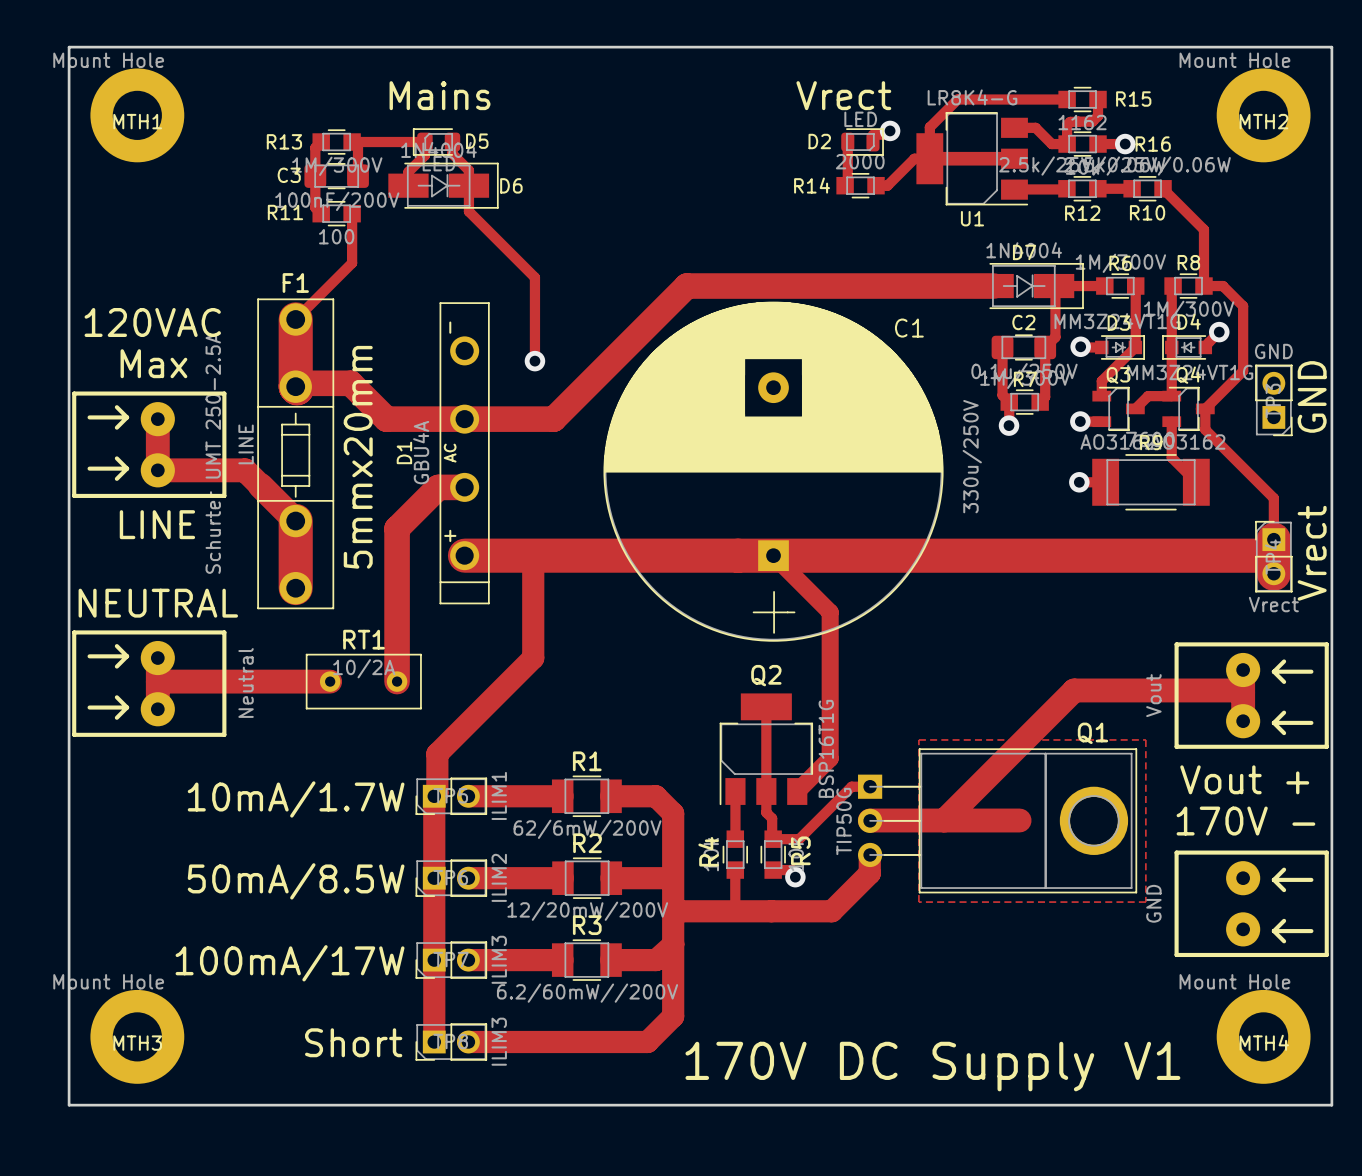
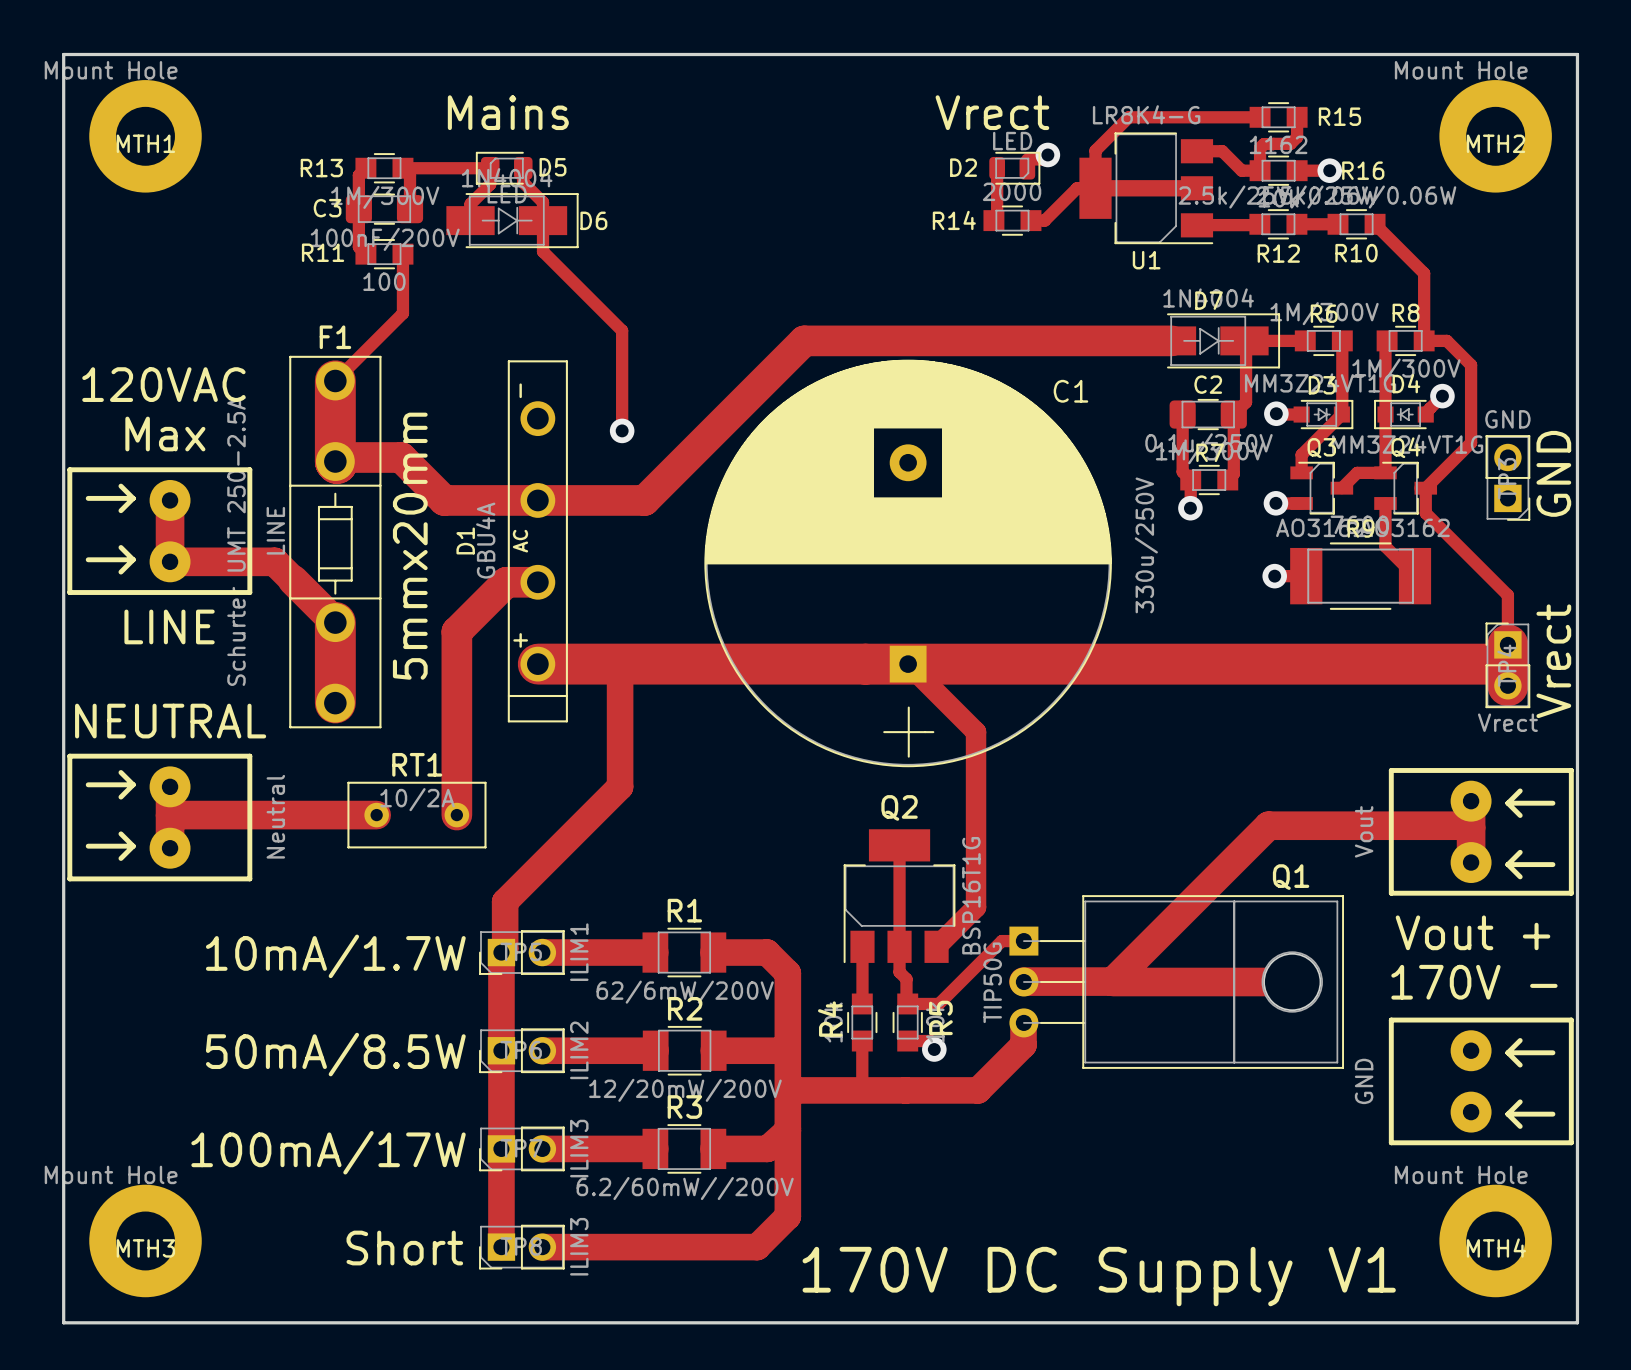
zone outline: (918, 739) (918, 902) (1145, 902) (1145, 739) (918, 739) -> none
Q1 footprint: [858, 748, 1138, 894] -> [1009, 895, 1345, 1069]
track: (944, 820) (1019, 820) -> (1113, 982) (1292, 982)

